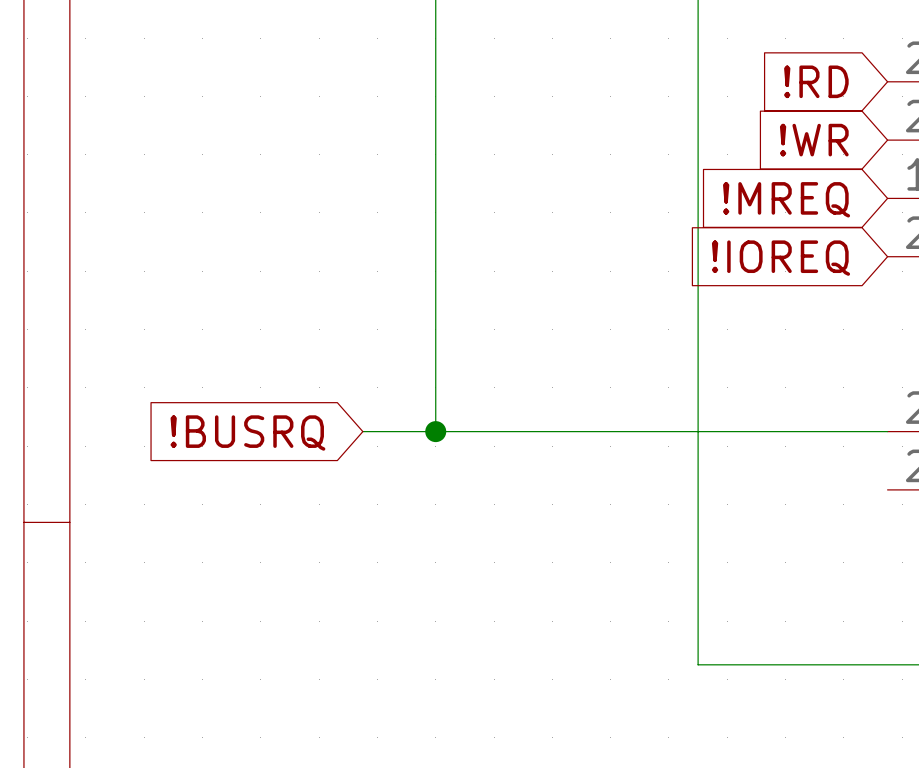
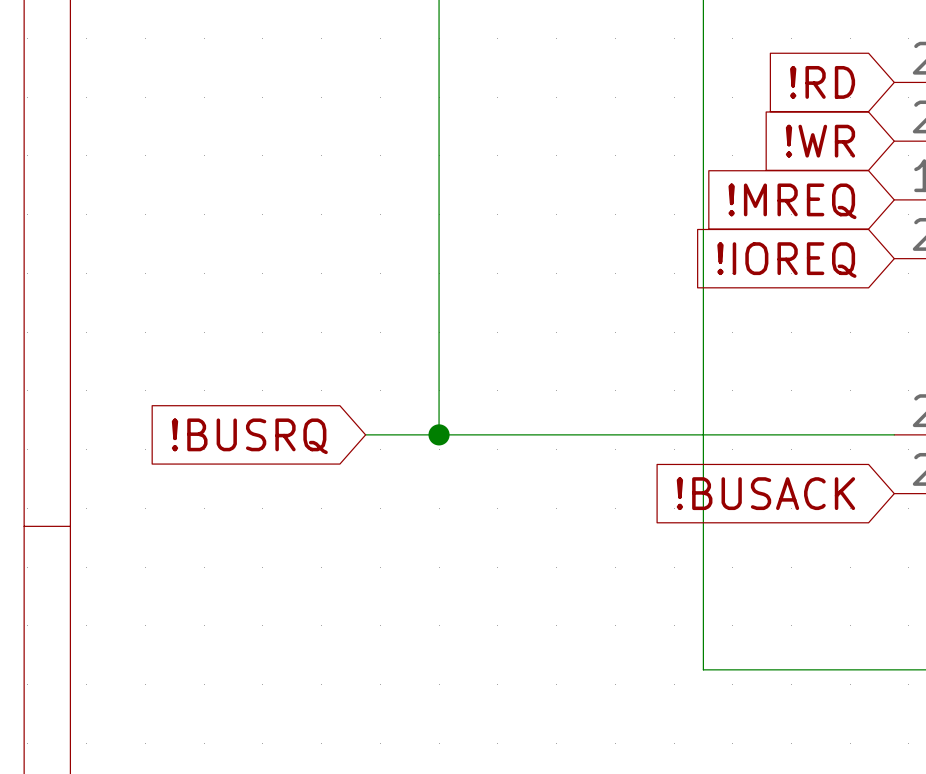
global label: none -> !BUSACK (765, 493)

